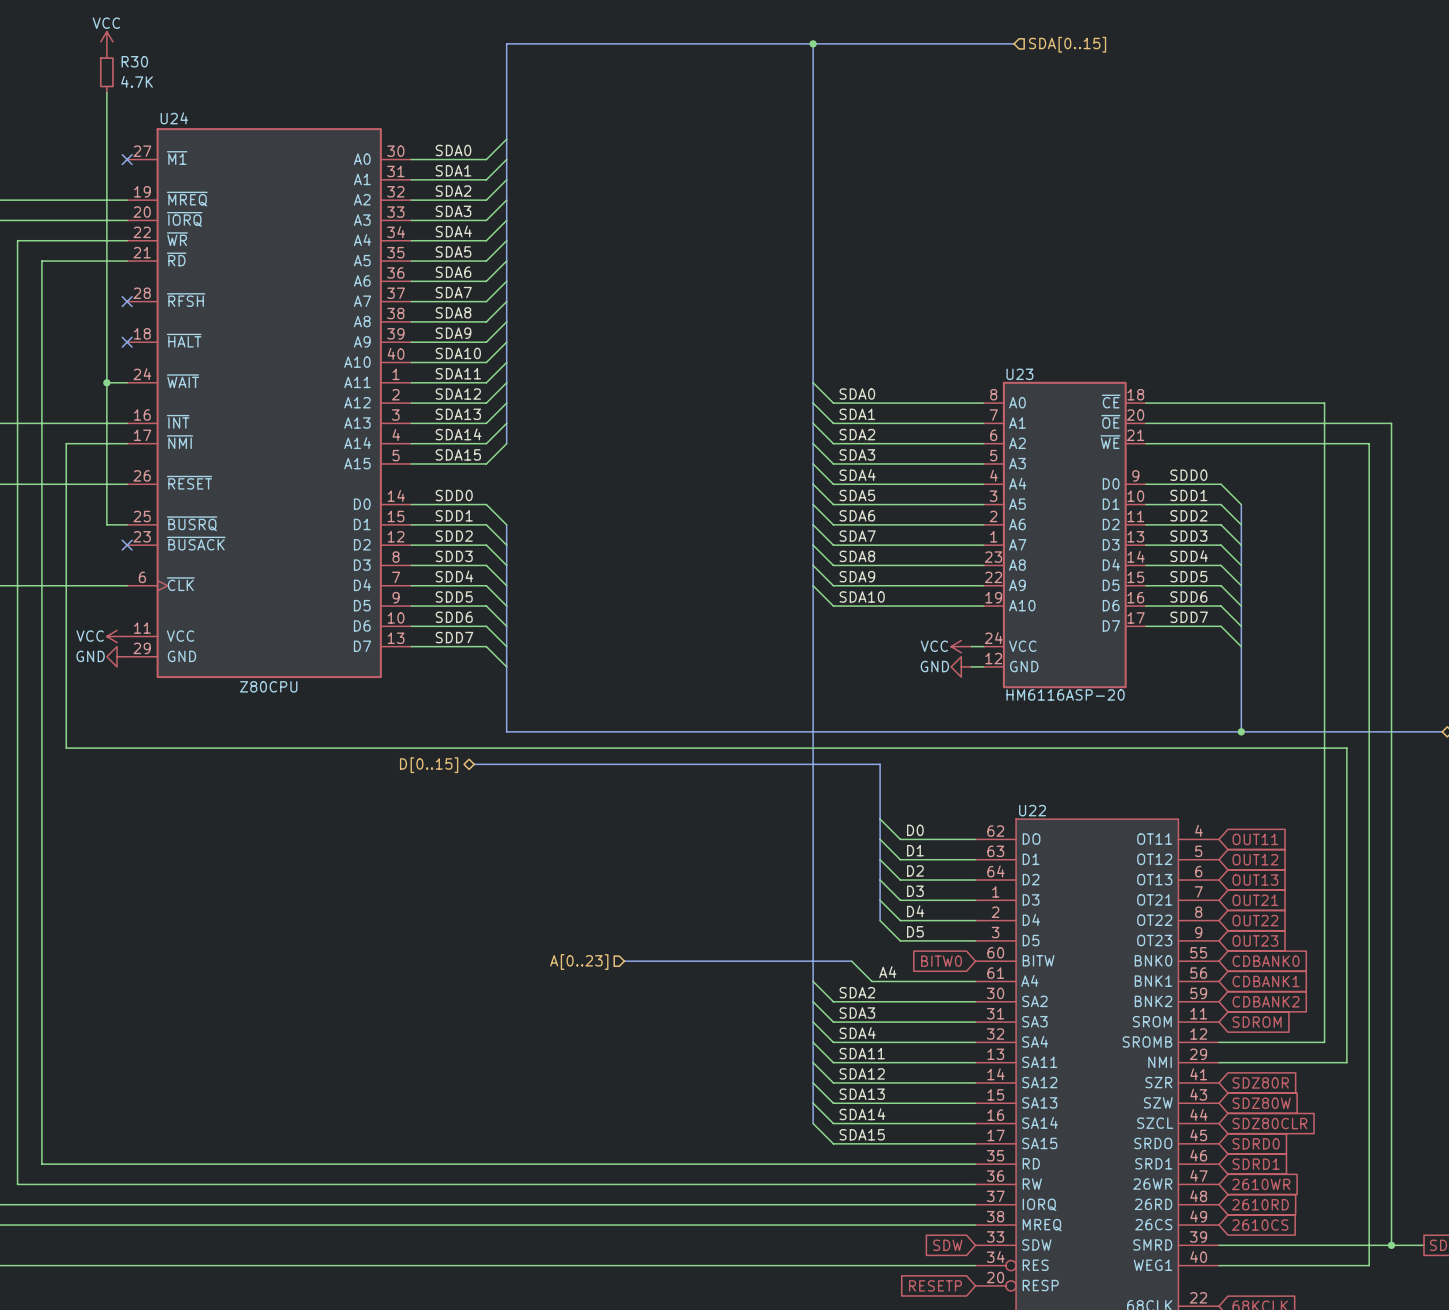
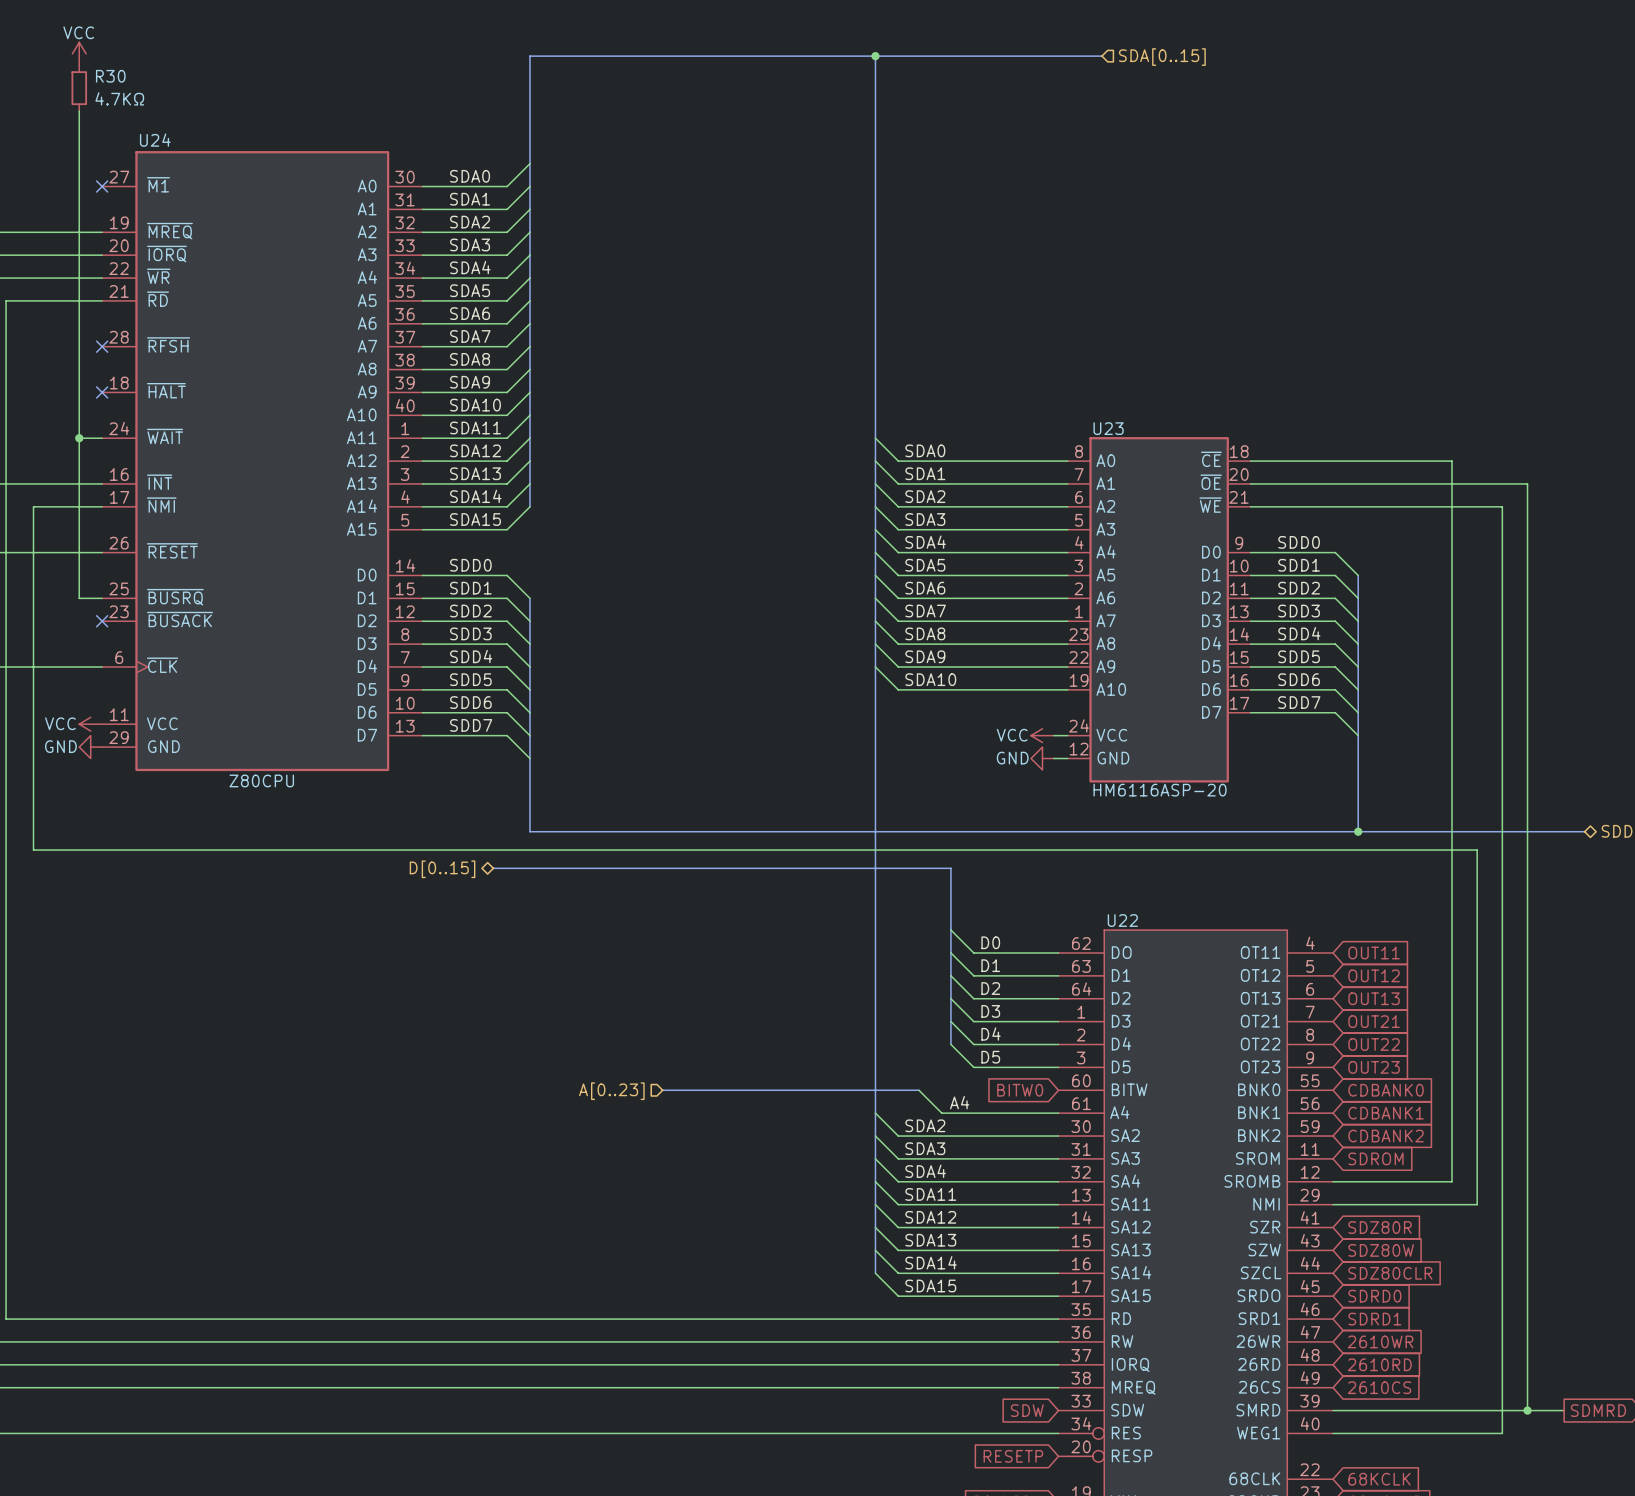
R30 value: 4.7K (137, 81) -> 4.7KΩ (119, 98)

